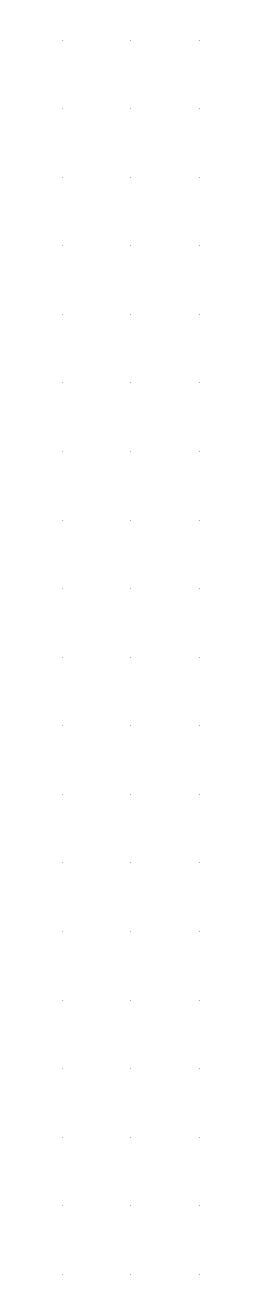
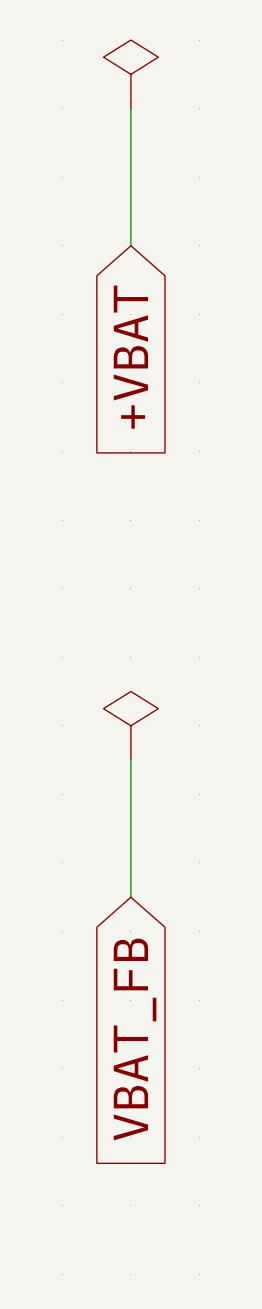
power symbol: none -> (130, 74)
wire: none -> (130, 108) (130, 245)
global label: none -> +VBAT (130, 357)
power symbol: none -> (130, 725)
wire: none -> (130, 760) (130, 897)
global label: none -> VBAT_FB (135, 1039)

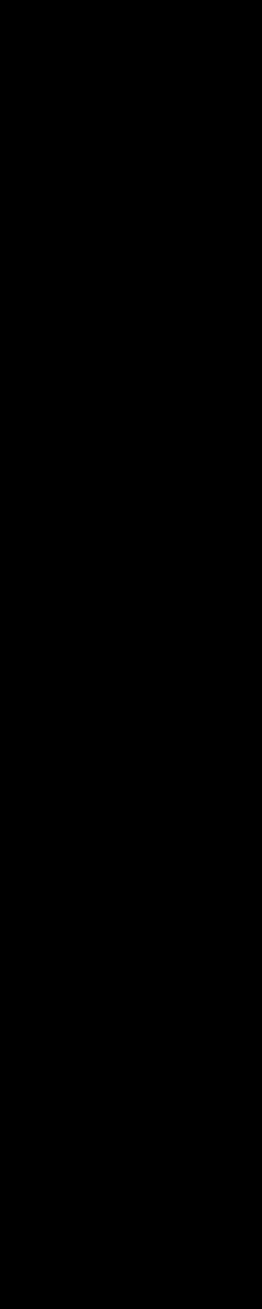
power symbol: (130, 74) -> none
wire: (130, 108) (130, 245) -> none
global label: +VBAT (130, 357) -> none
power symbol: (130, 725) -> none
wire: (130, 760) (130, 897) -> none
global label: VBAT_FB (135, 1039) -> none

